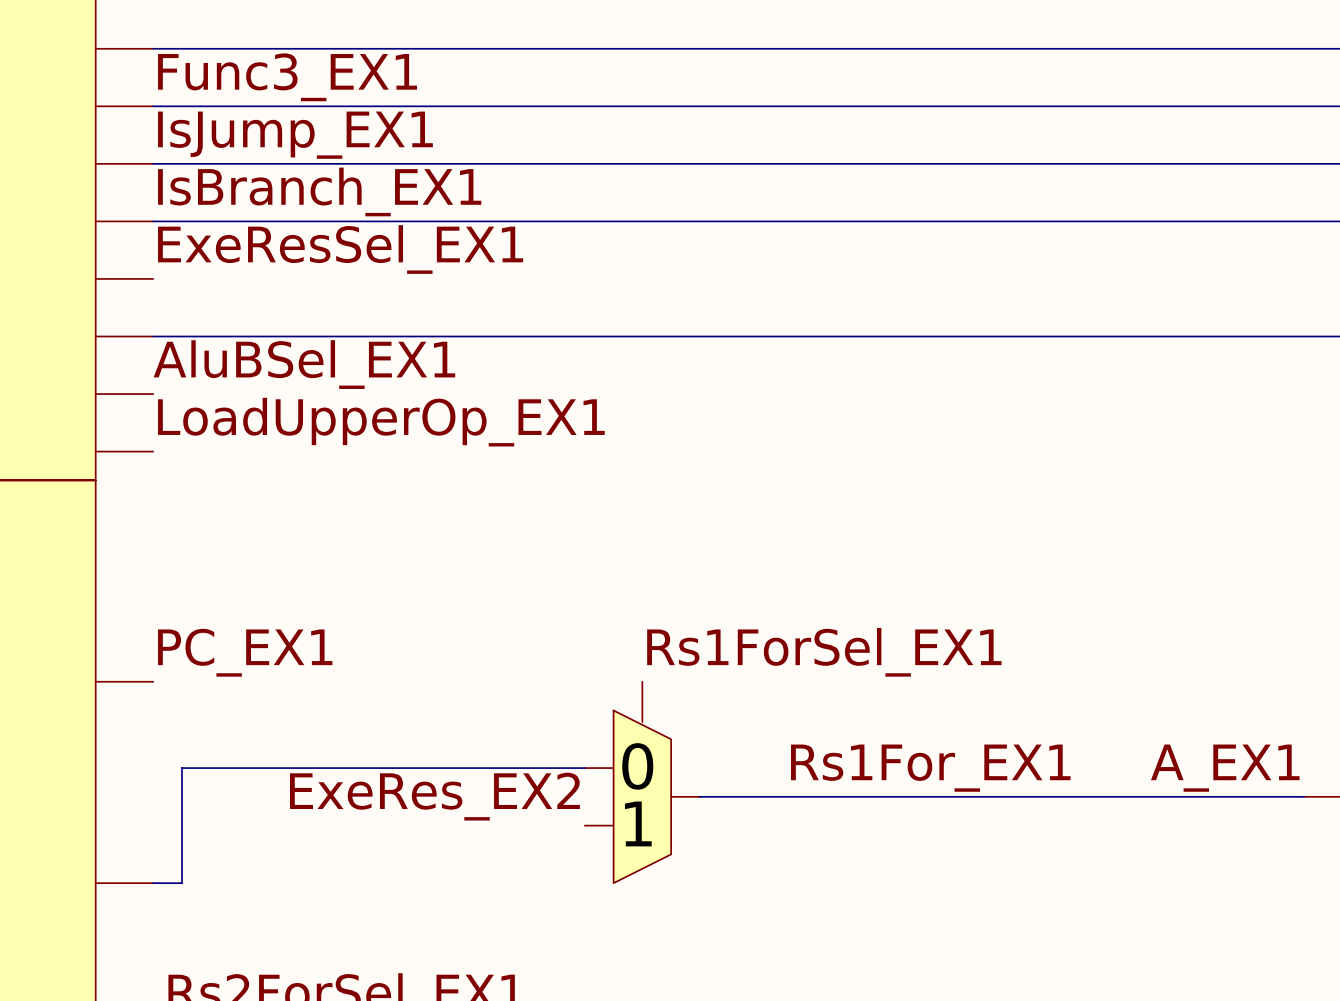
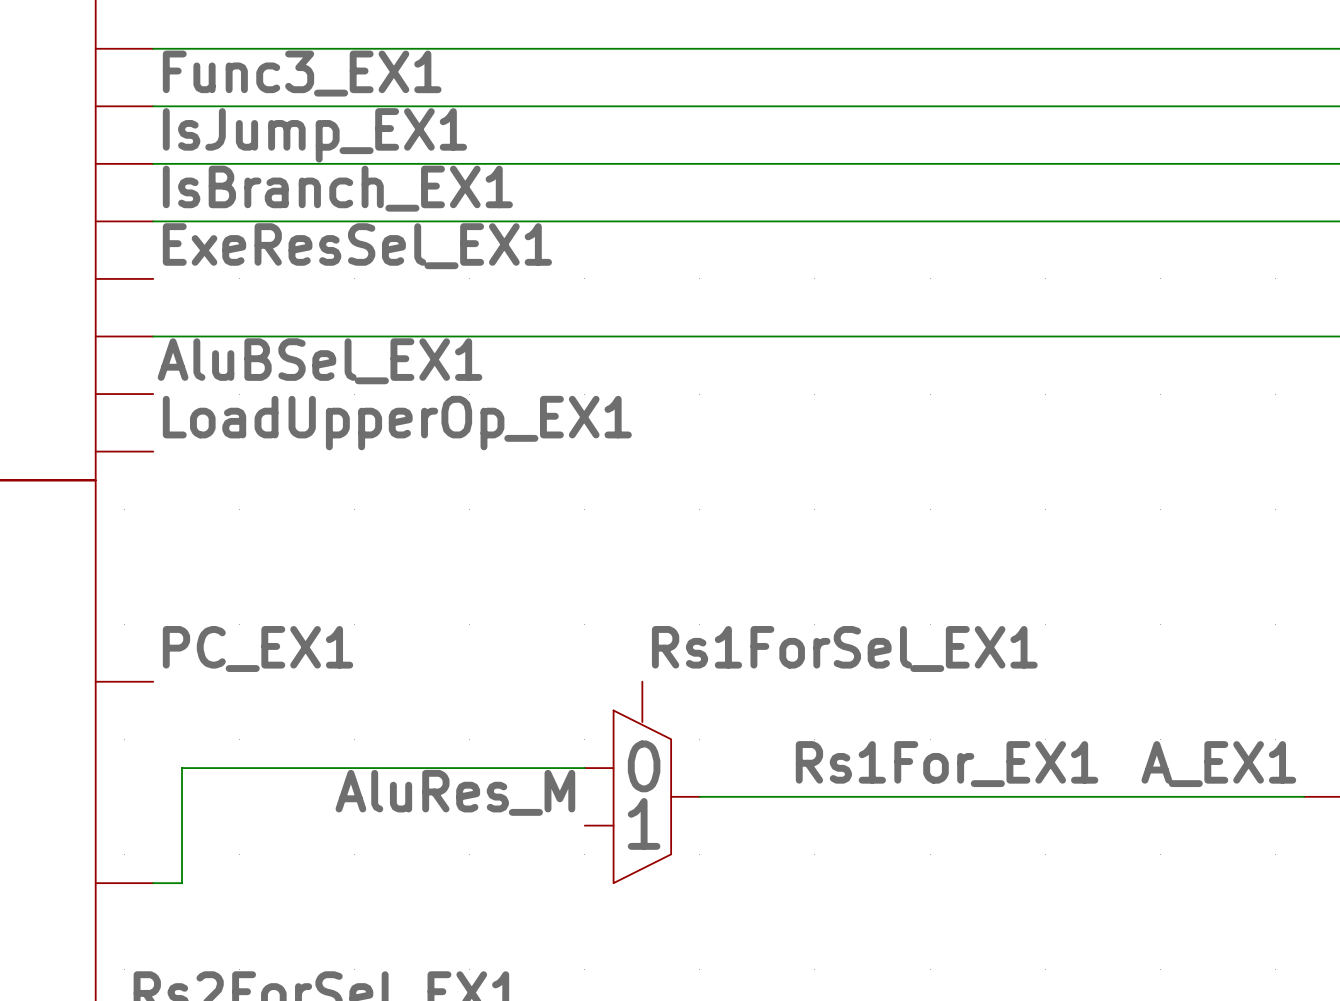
label: ExeRes_EX2 (434, 796) -> AluRes_M (455, 792)

